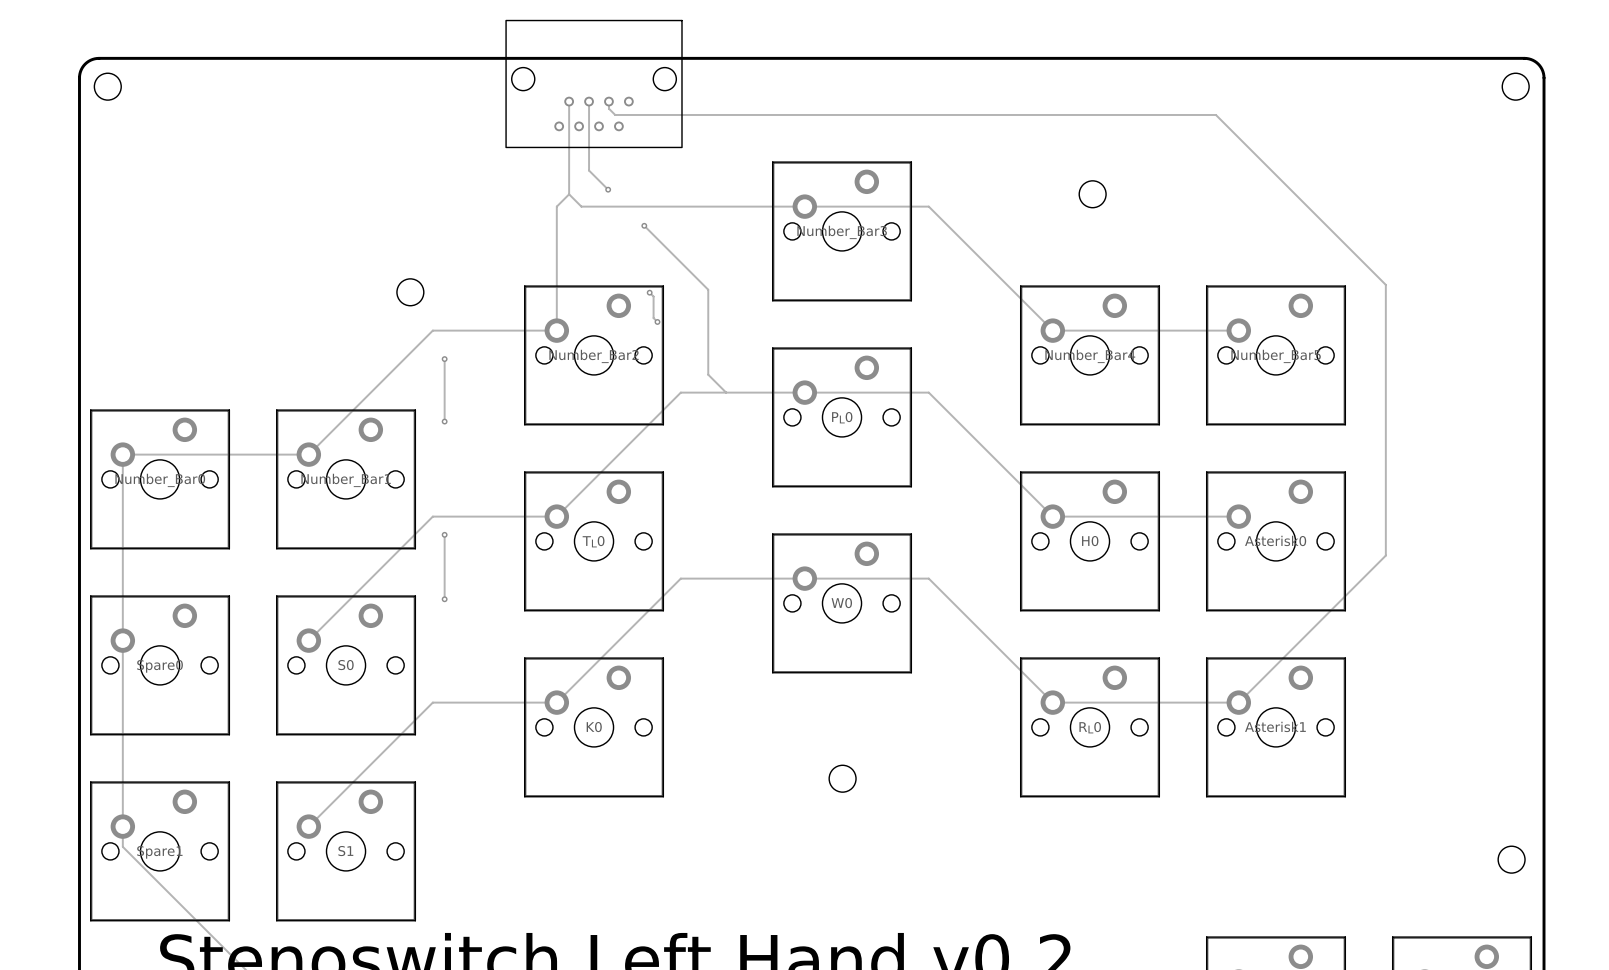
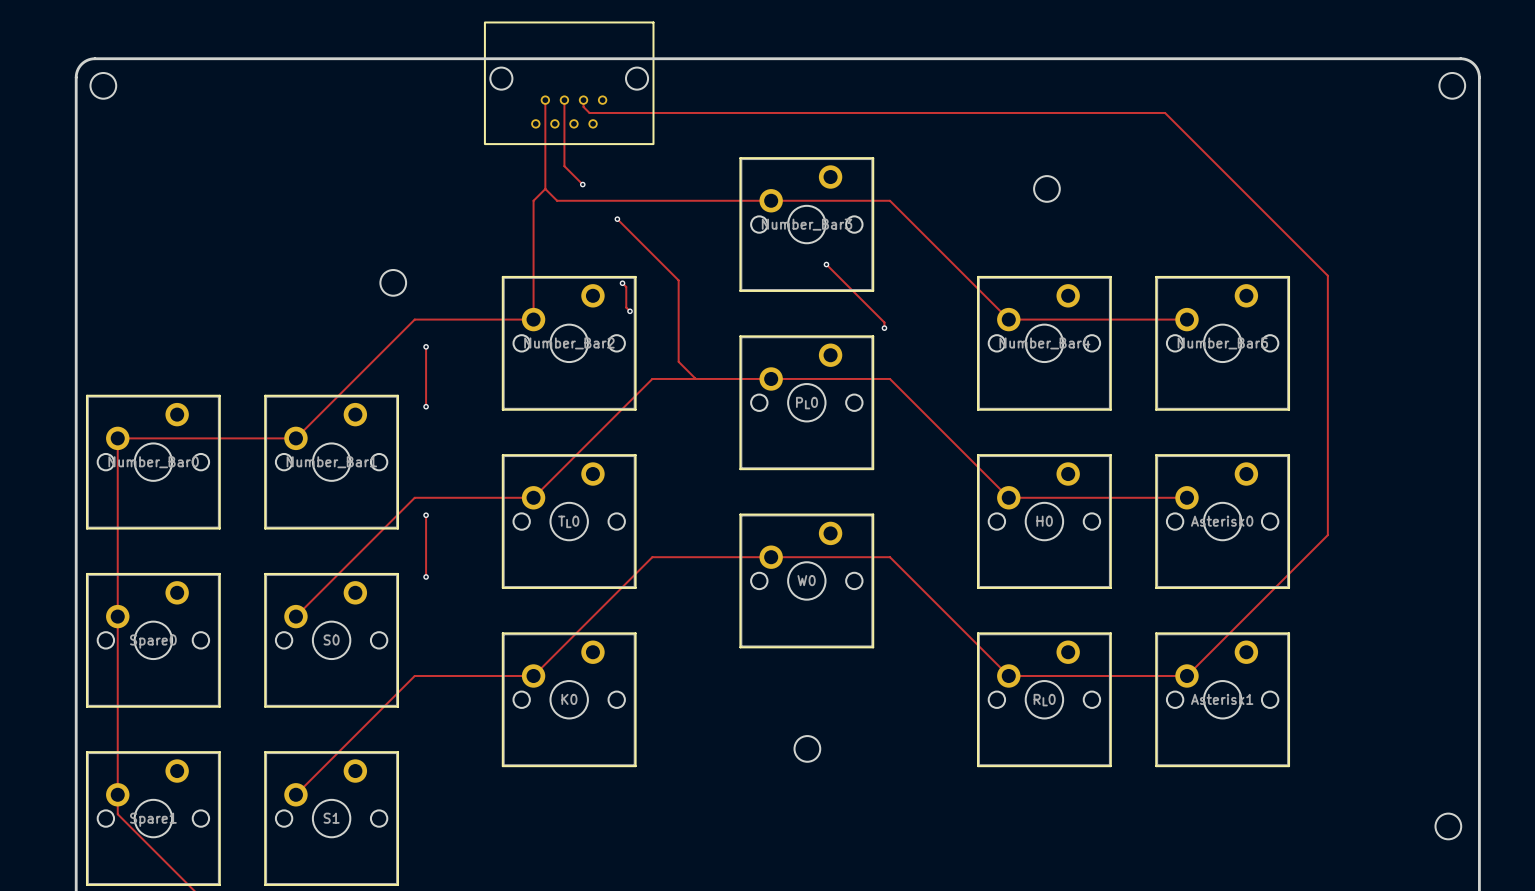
track: none -> (826, 264) (884, 322) (884, 328)
via: none -> (826, 264)
via: none -> (884, 328)

